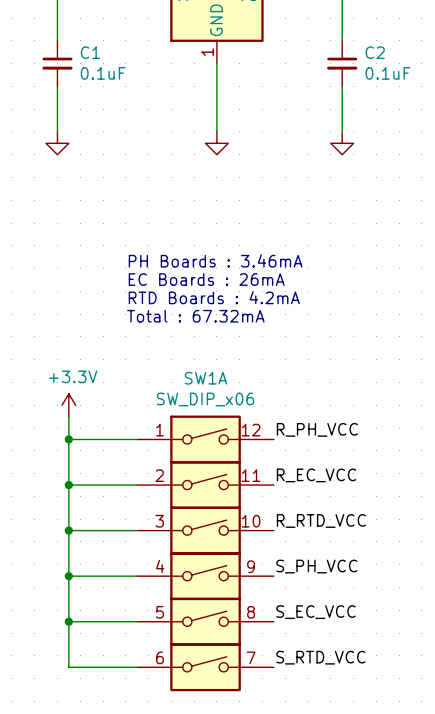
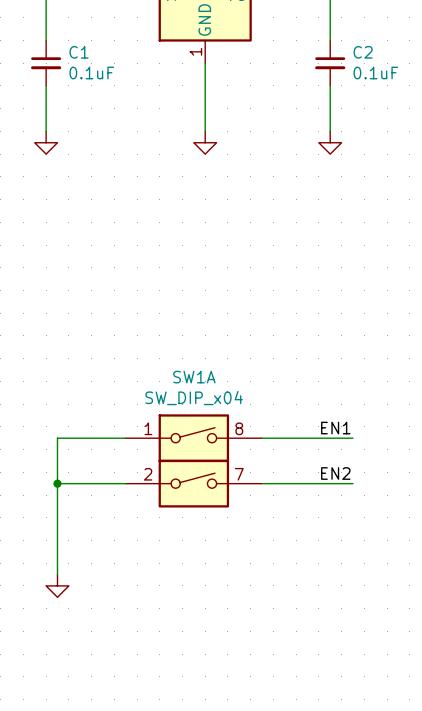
text: PH Boards : 3.46mA (215, 260) -> none
text: EC Boards : 26mA (206, 279) -> none
text: RTD Boards : 4.2mA (214, 297) -> none
text: Total : 67.32mA (195, 316) -> none
SW1A value: SW_DIP_x06 (205, 399) -> SW_DIP_x04 (194, 398)
power symbol: +3.3V (68, 405) -> none
wire: (68, 416) (68, 439) -> none
label: R_PH_VCC (317, 429) -> none
label: none -> EN1 (335, 428)
SW1A pin number: 12 (251, 430) -> 8 (239, 428)
junction: (68, 439) -> none
wire: none -> (262, 438) (352, 438)
label: none -> EN2 (335, 473)
part pin number: 11 (251, 475) -> 7 (239, 474)
label: R_EC_VCC (316, 475) -> none
wire: none -> (262, 483) (352, 483)
label: R_RTD_VCC (321, 520) -> none
wire: (68, 530) (137, 530) -> none
junction: (68, 530) -> none
part: (205, 530) -> none
label: S_PH_VCC (316, 566) -> none
junction: (68, 576) -> none
wire: (137, 576) (68, 576) (68, 667) (137, 667) -> none
part: (205, 576) -> none
power symbol: none -> (57, 585)
label: S_EC_VCC (315, 612) -> none
wire: (68, 621) (137, 621) -> none
junction: (68, 621) -> none
part: (205, 621) -> none
label: S_RTD_VCC (320, 657) -> none
part: (205, 667) -> none

